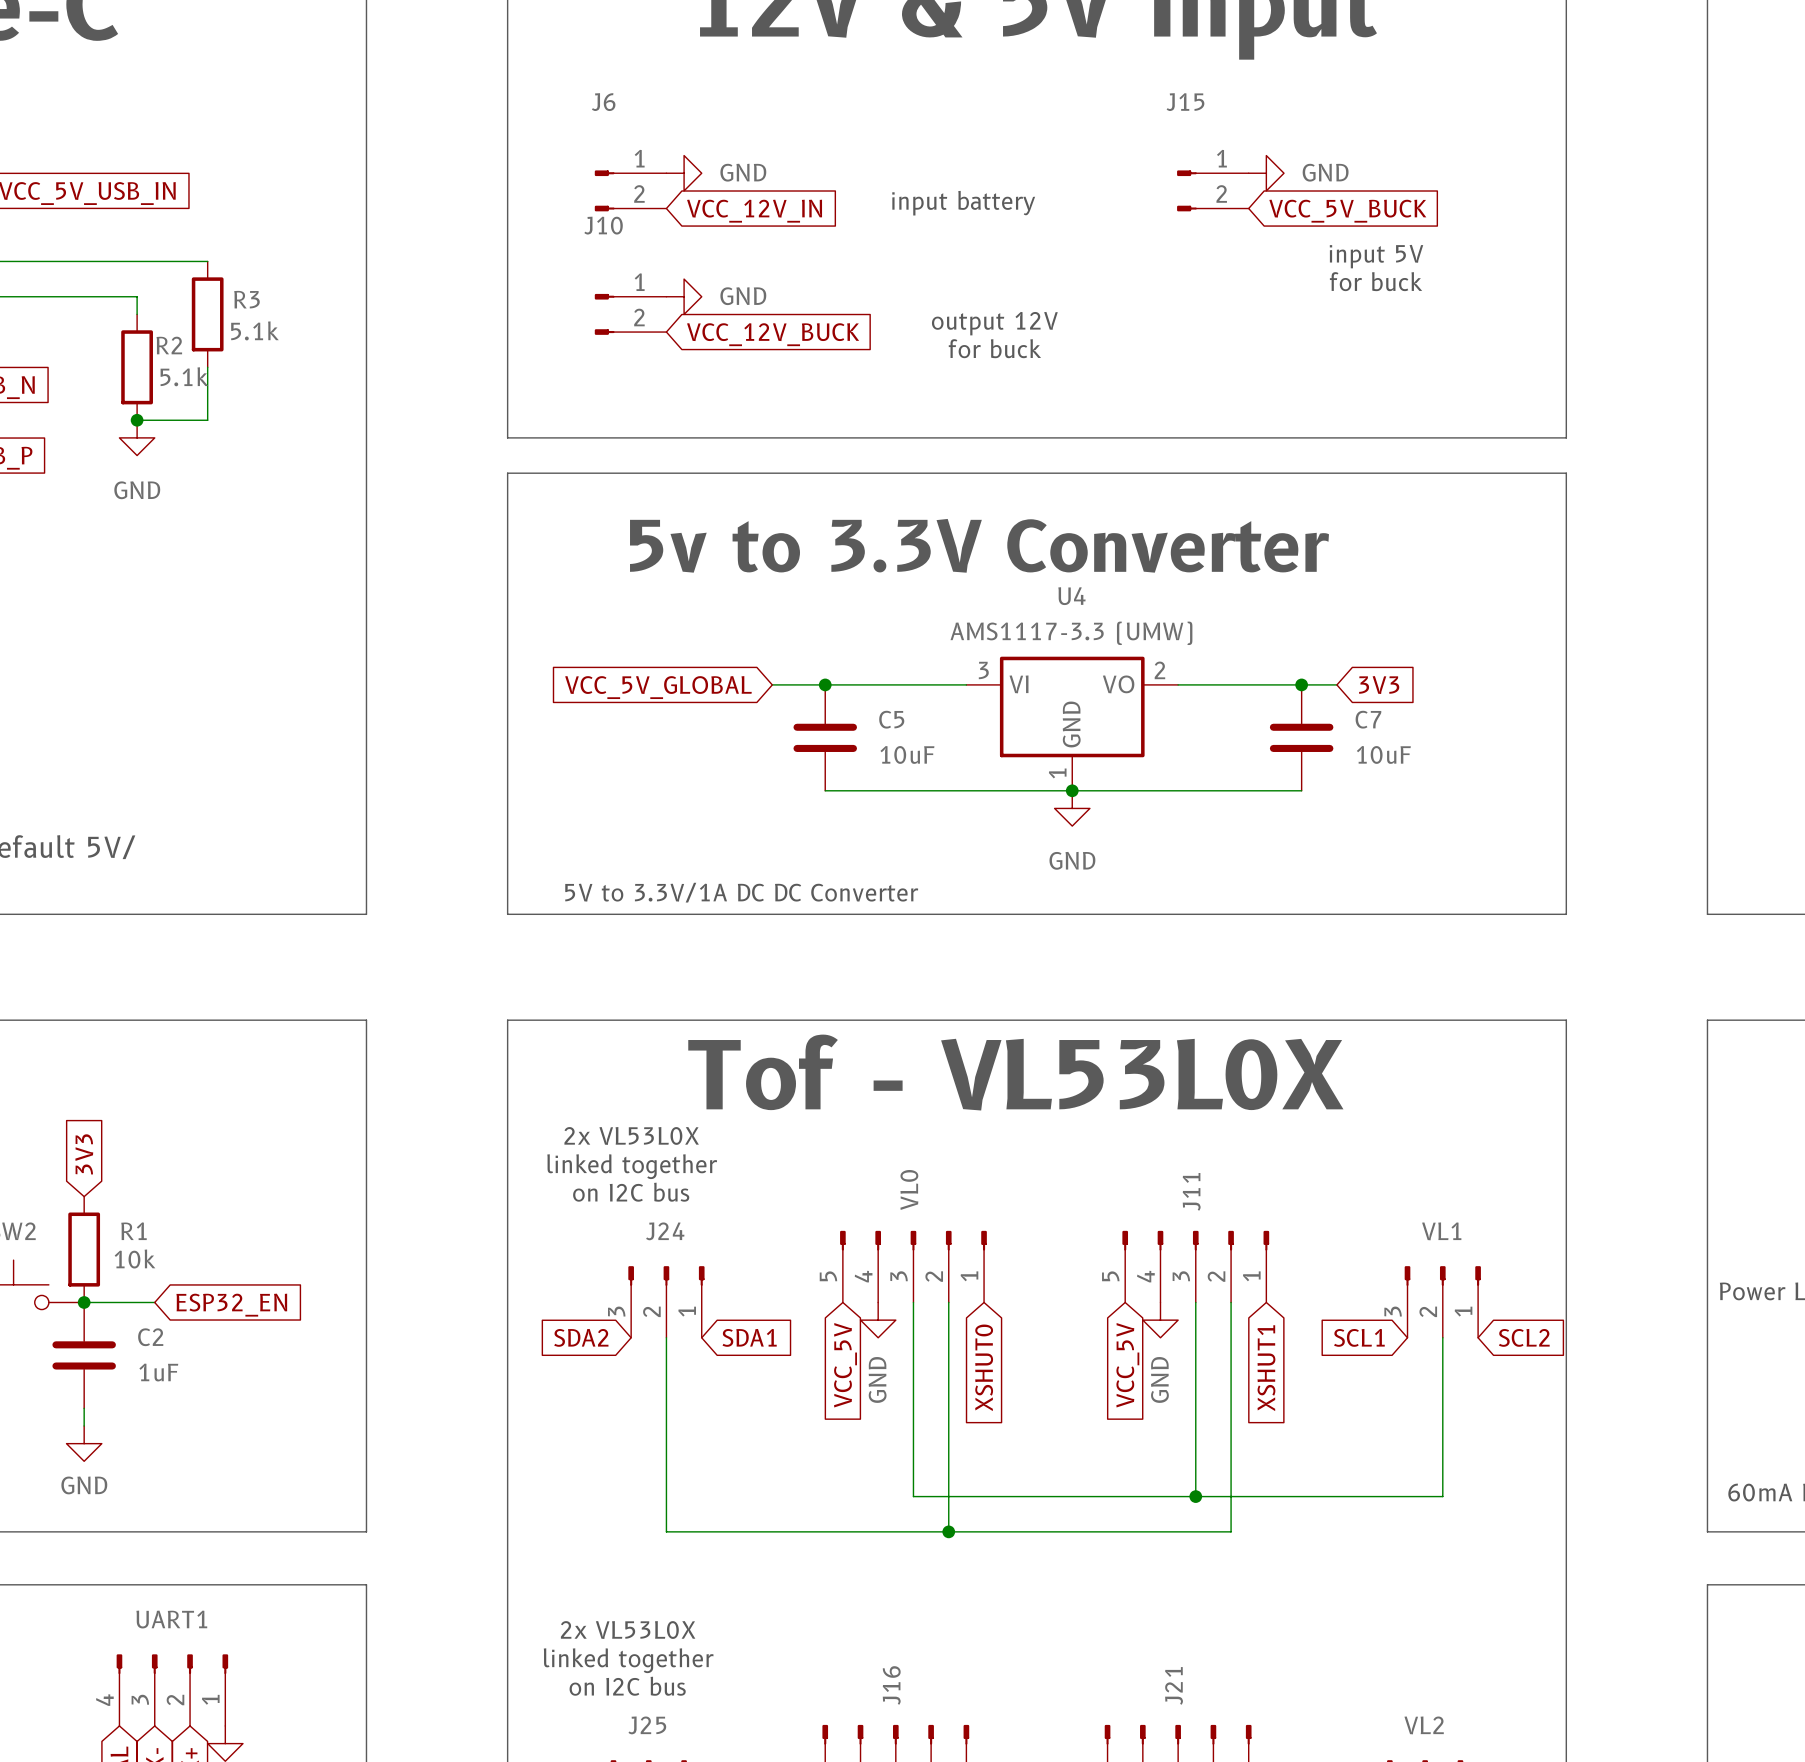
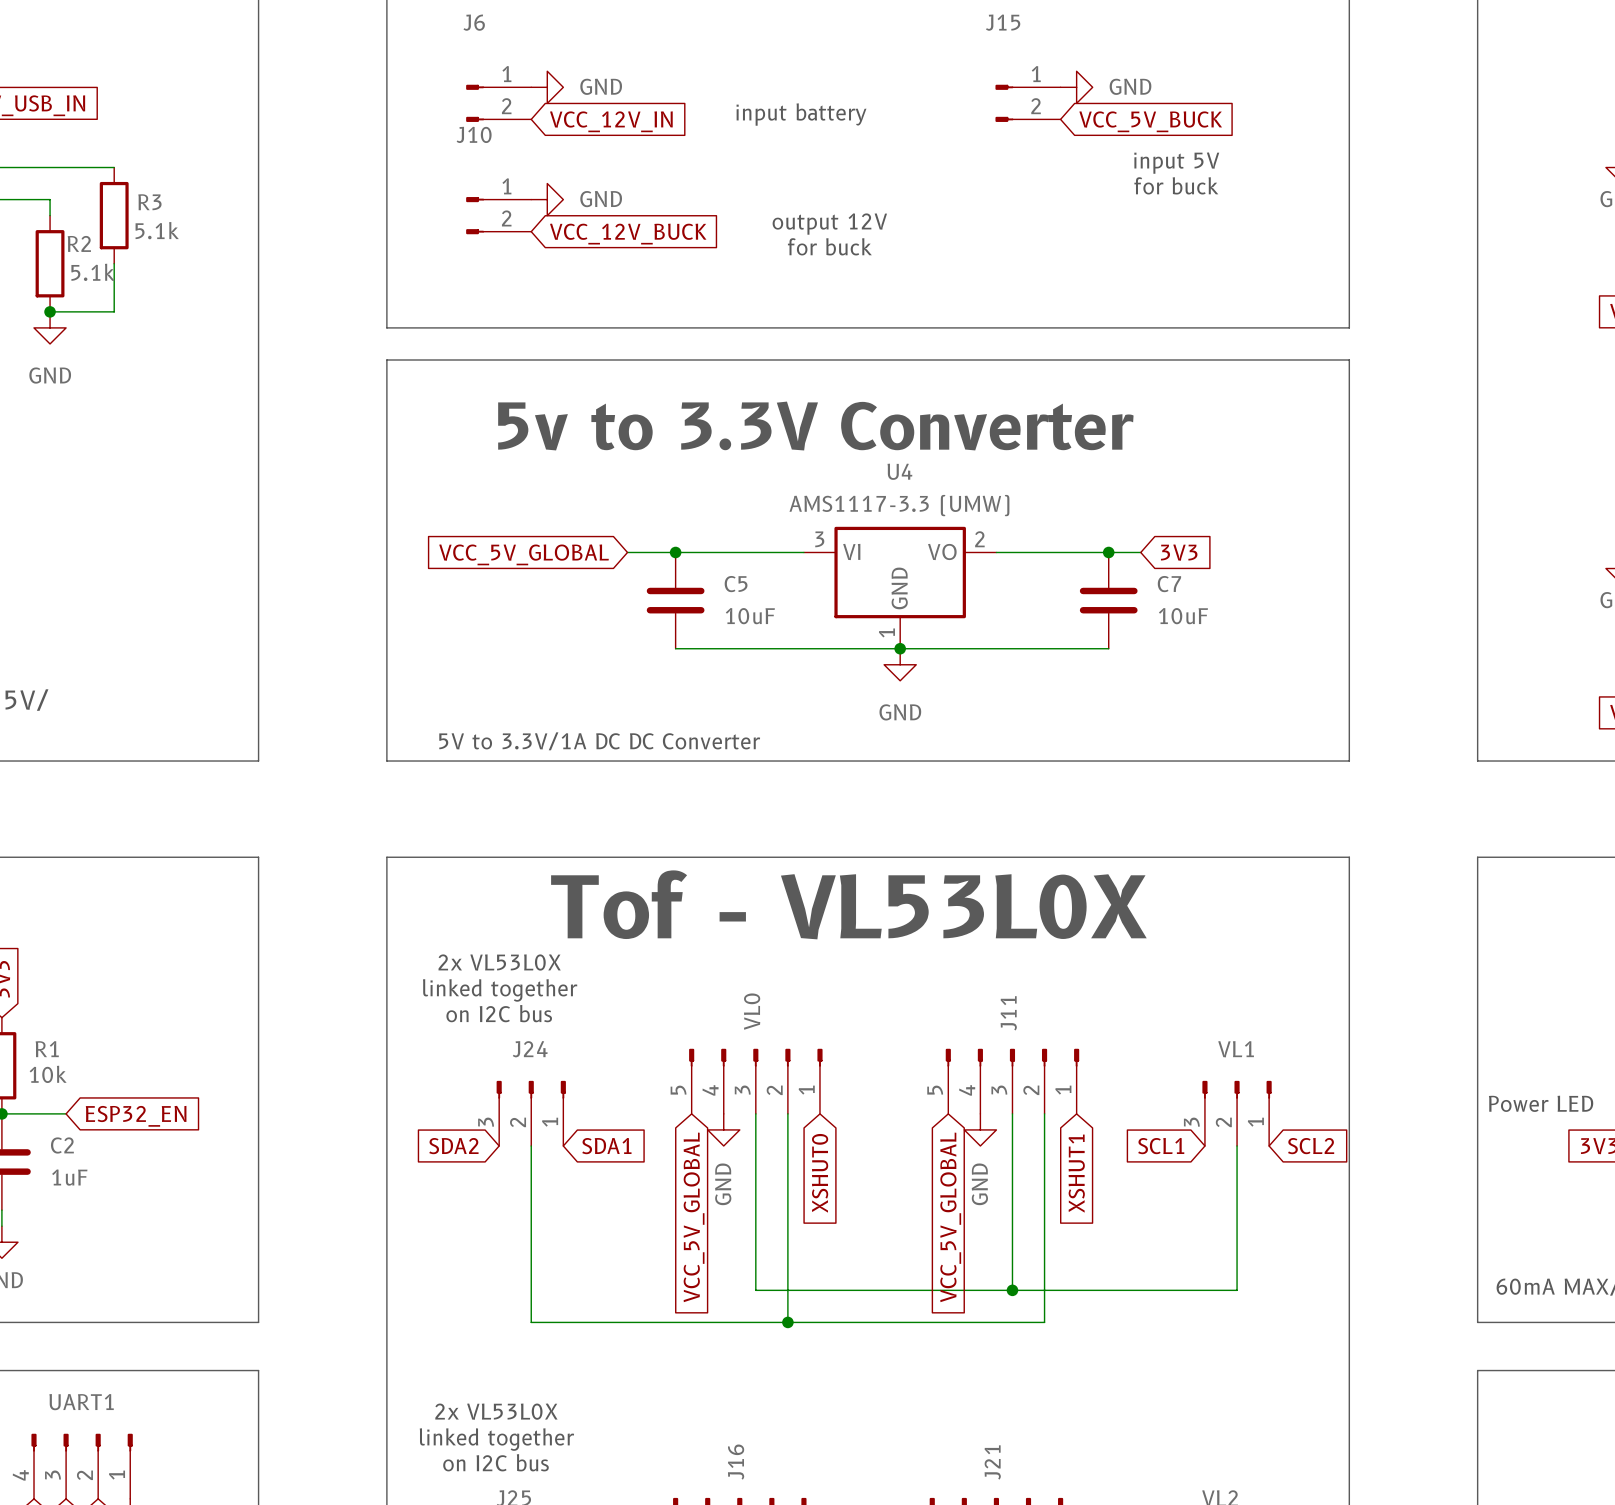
global label: VCC_5V (845, 1365) -> VCC_5V_GLOBAL (694, 1217)
global label: VCC_5V (1127, 1365) -> VCC_5V_GLOBAL (950, 1217)

